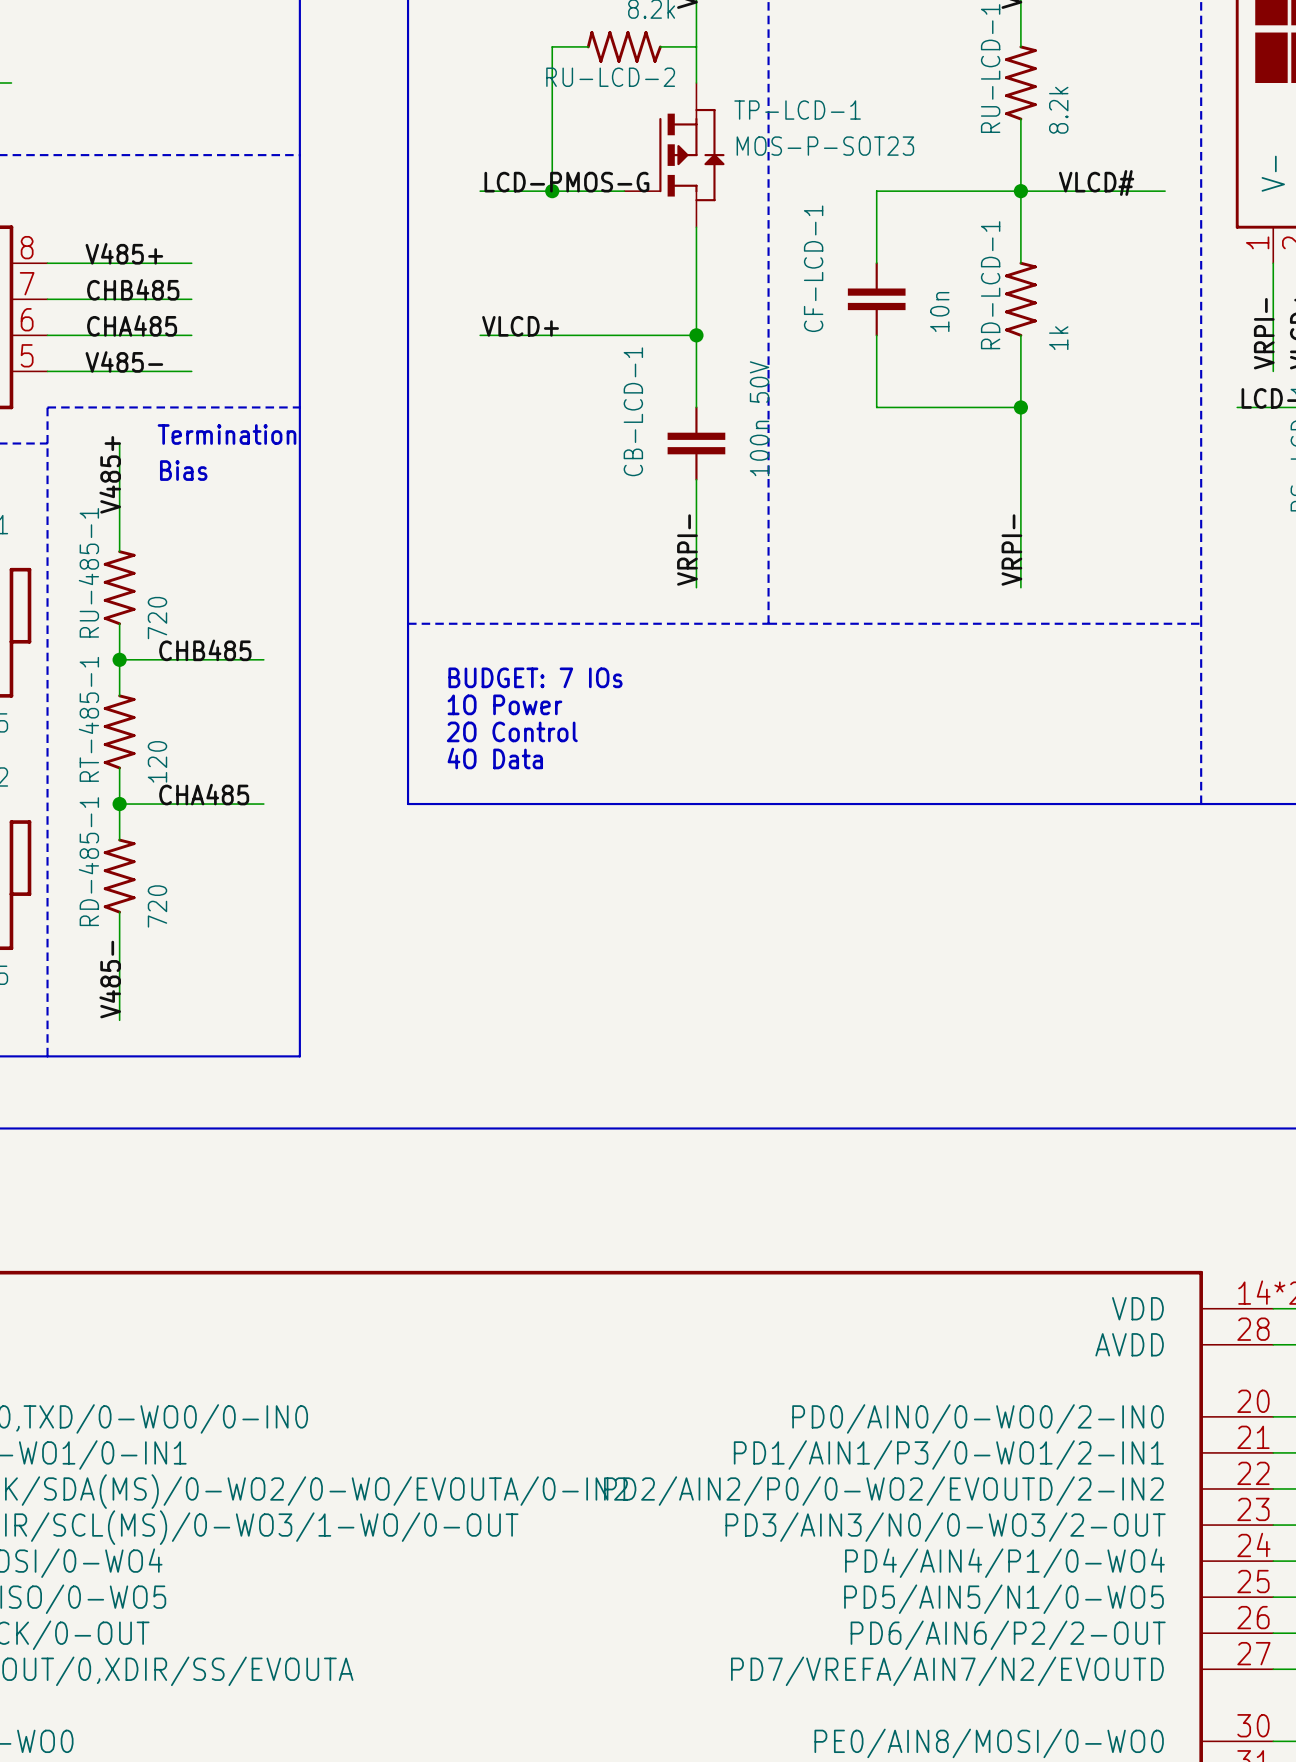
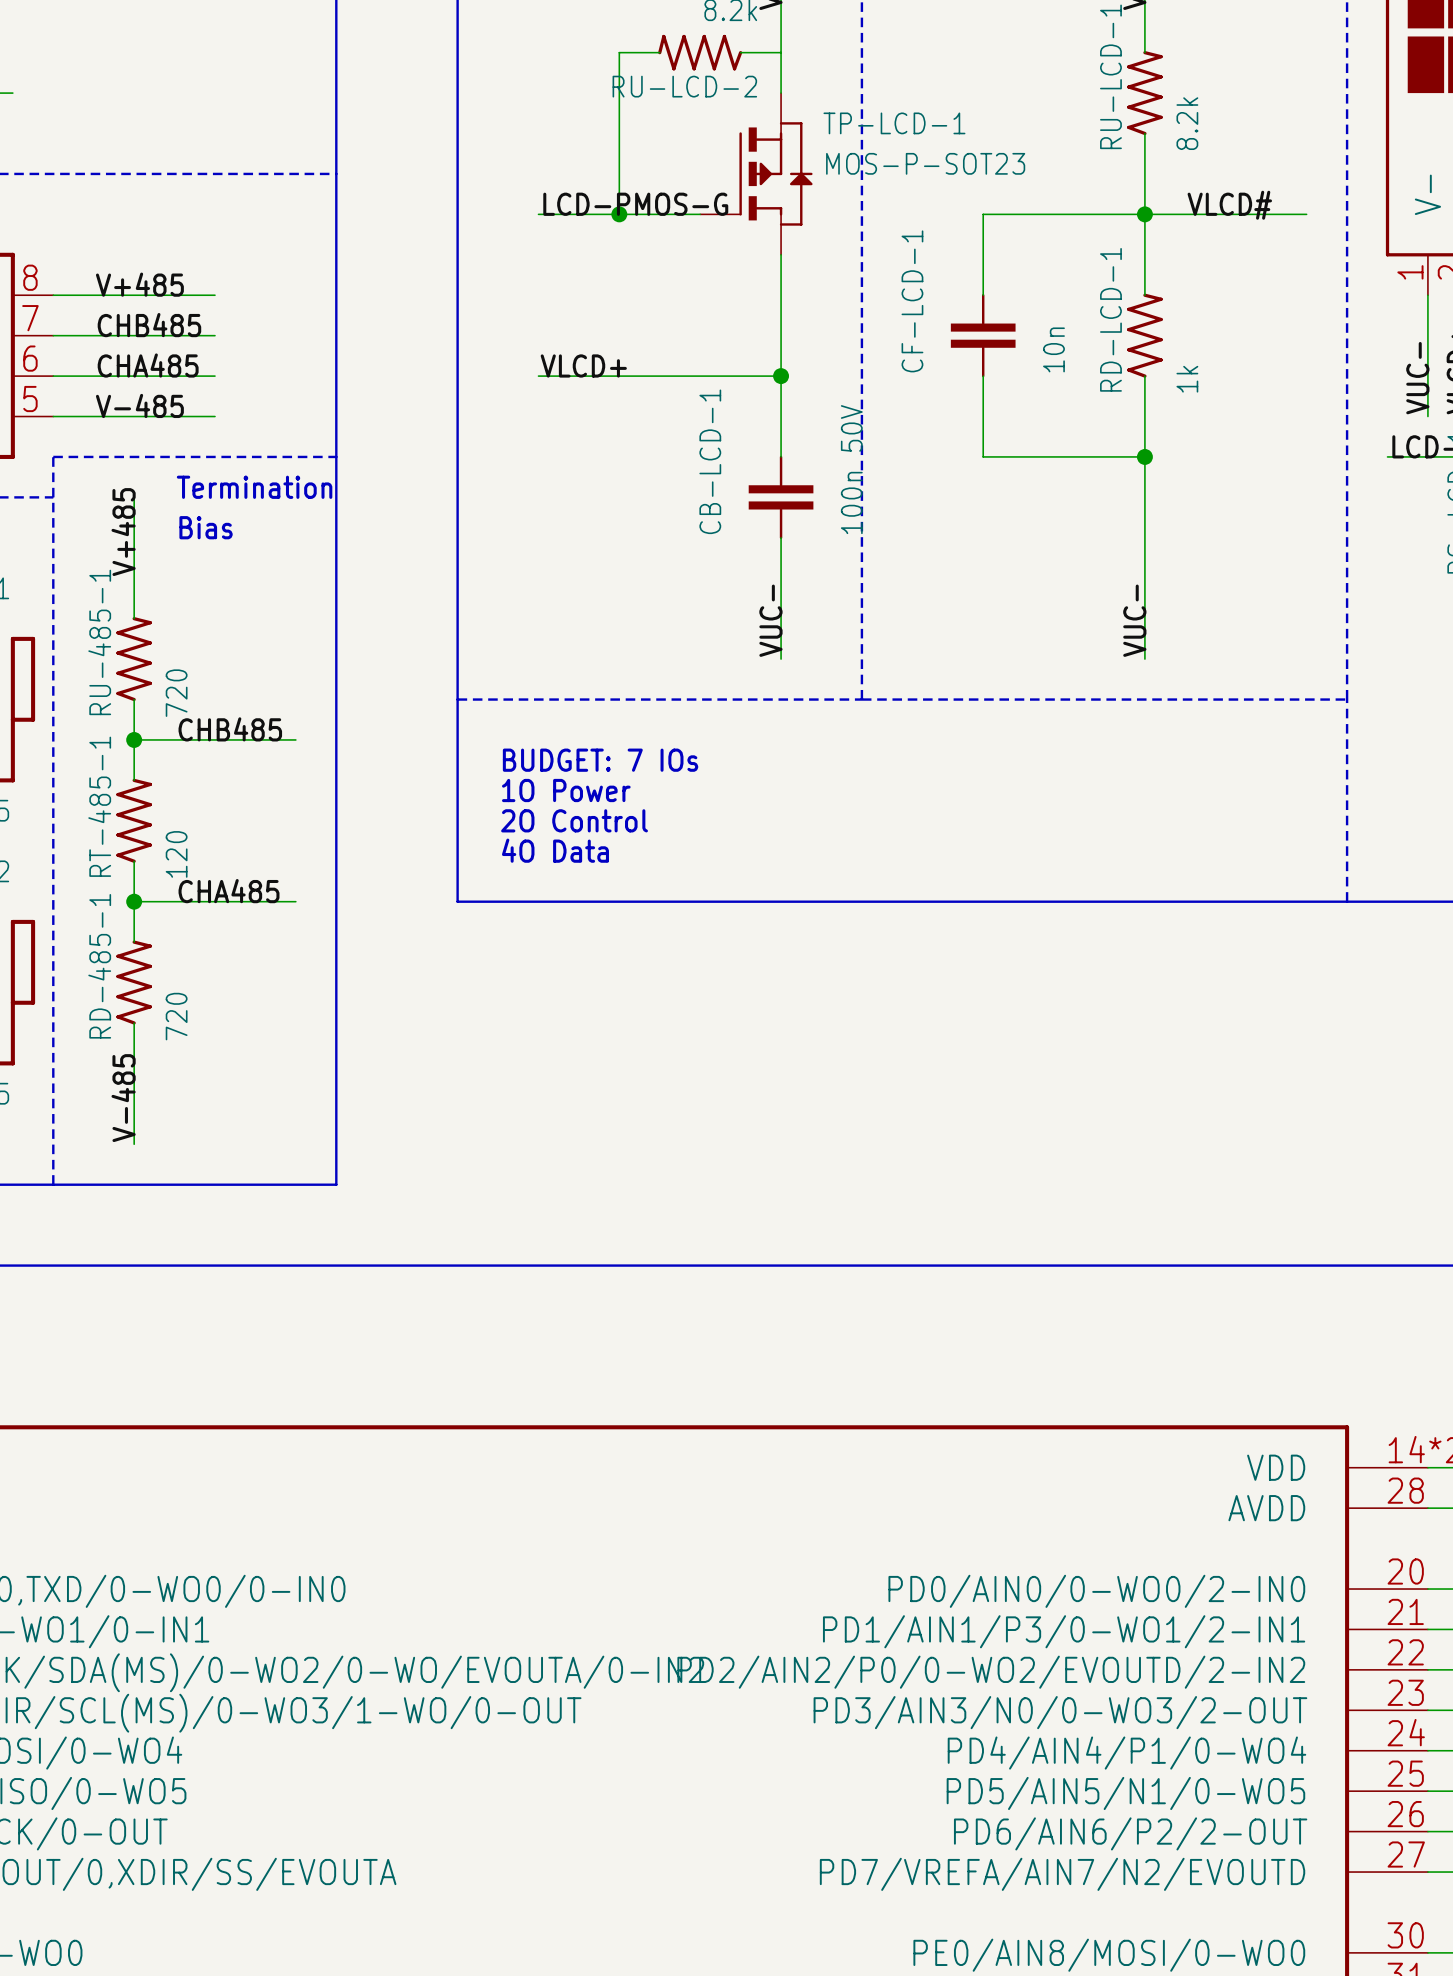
label: V485+ (124, 253) -> V+485 (139, 284)
label: VRPI- (1264, 333) -> VUC- (1417, 378)
label: V485- (124, 361) -> V-485 (139, 405)
label: V485+ (110, 474) -> V+485 (123, 532)
label: VRPI- (687, 550) -> VUC- (770, 620)
label: VRPI- (1011, 550) -> VUC- (1134, 620)
label: V485- (110, 979) -> V-485 (123, 1098)

